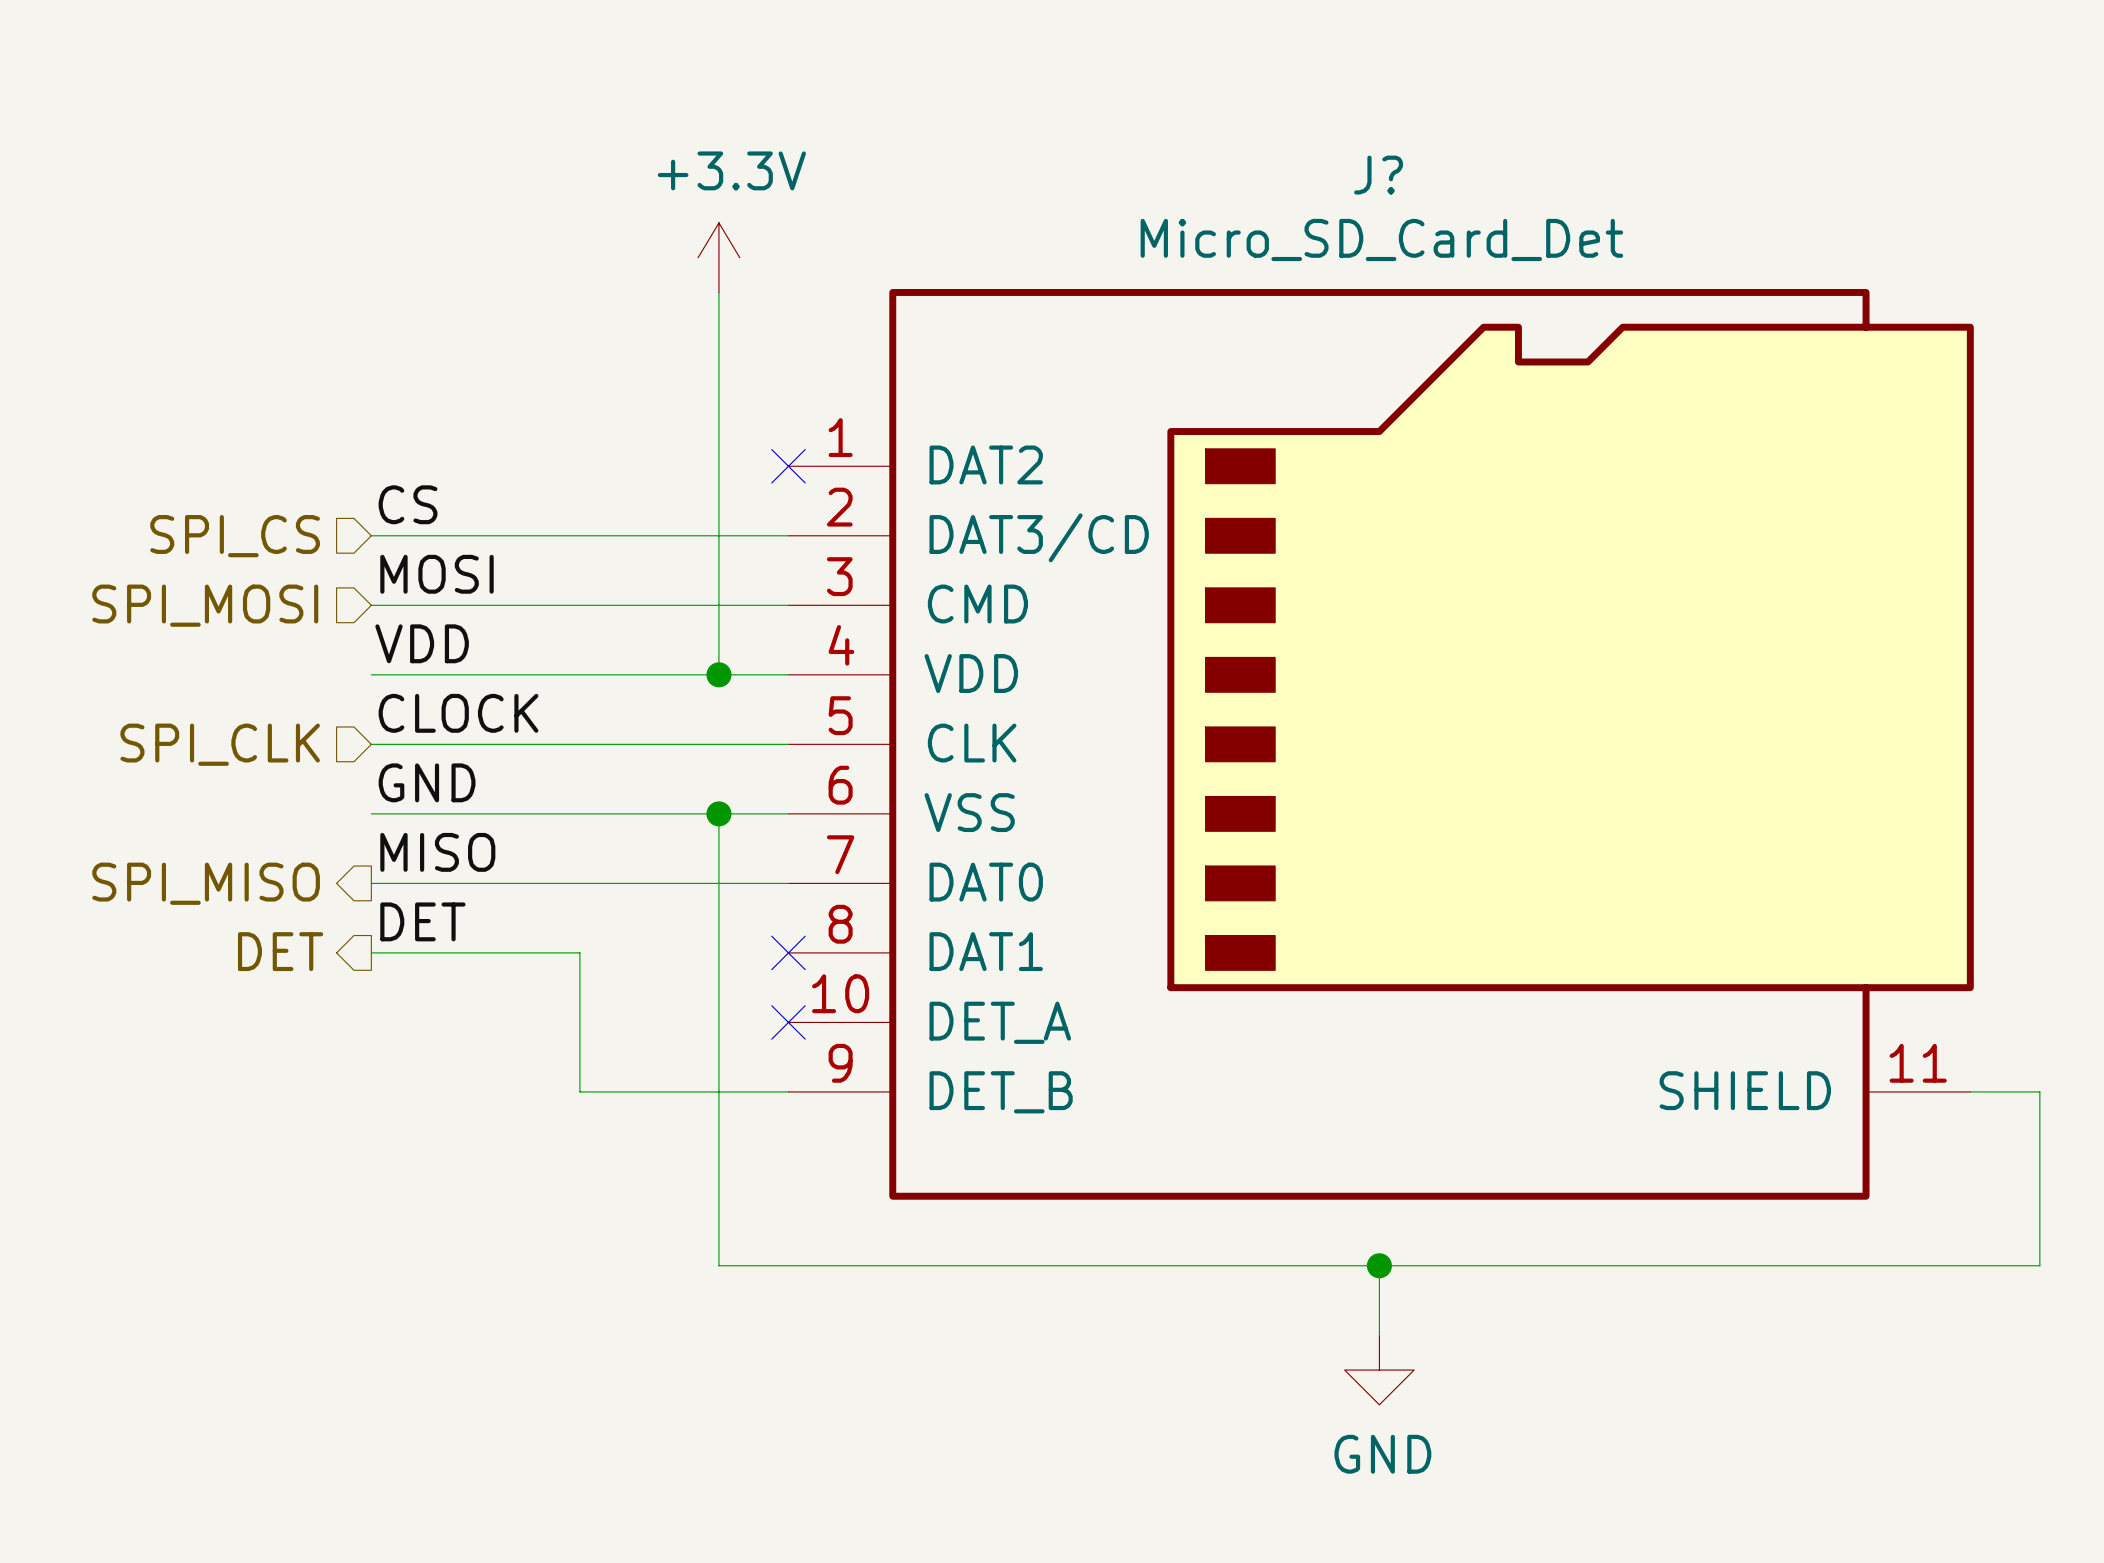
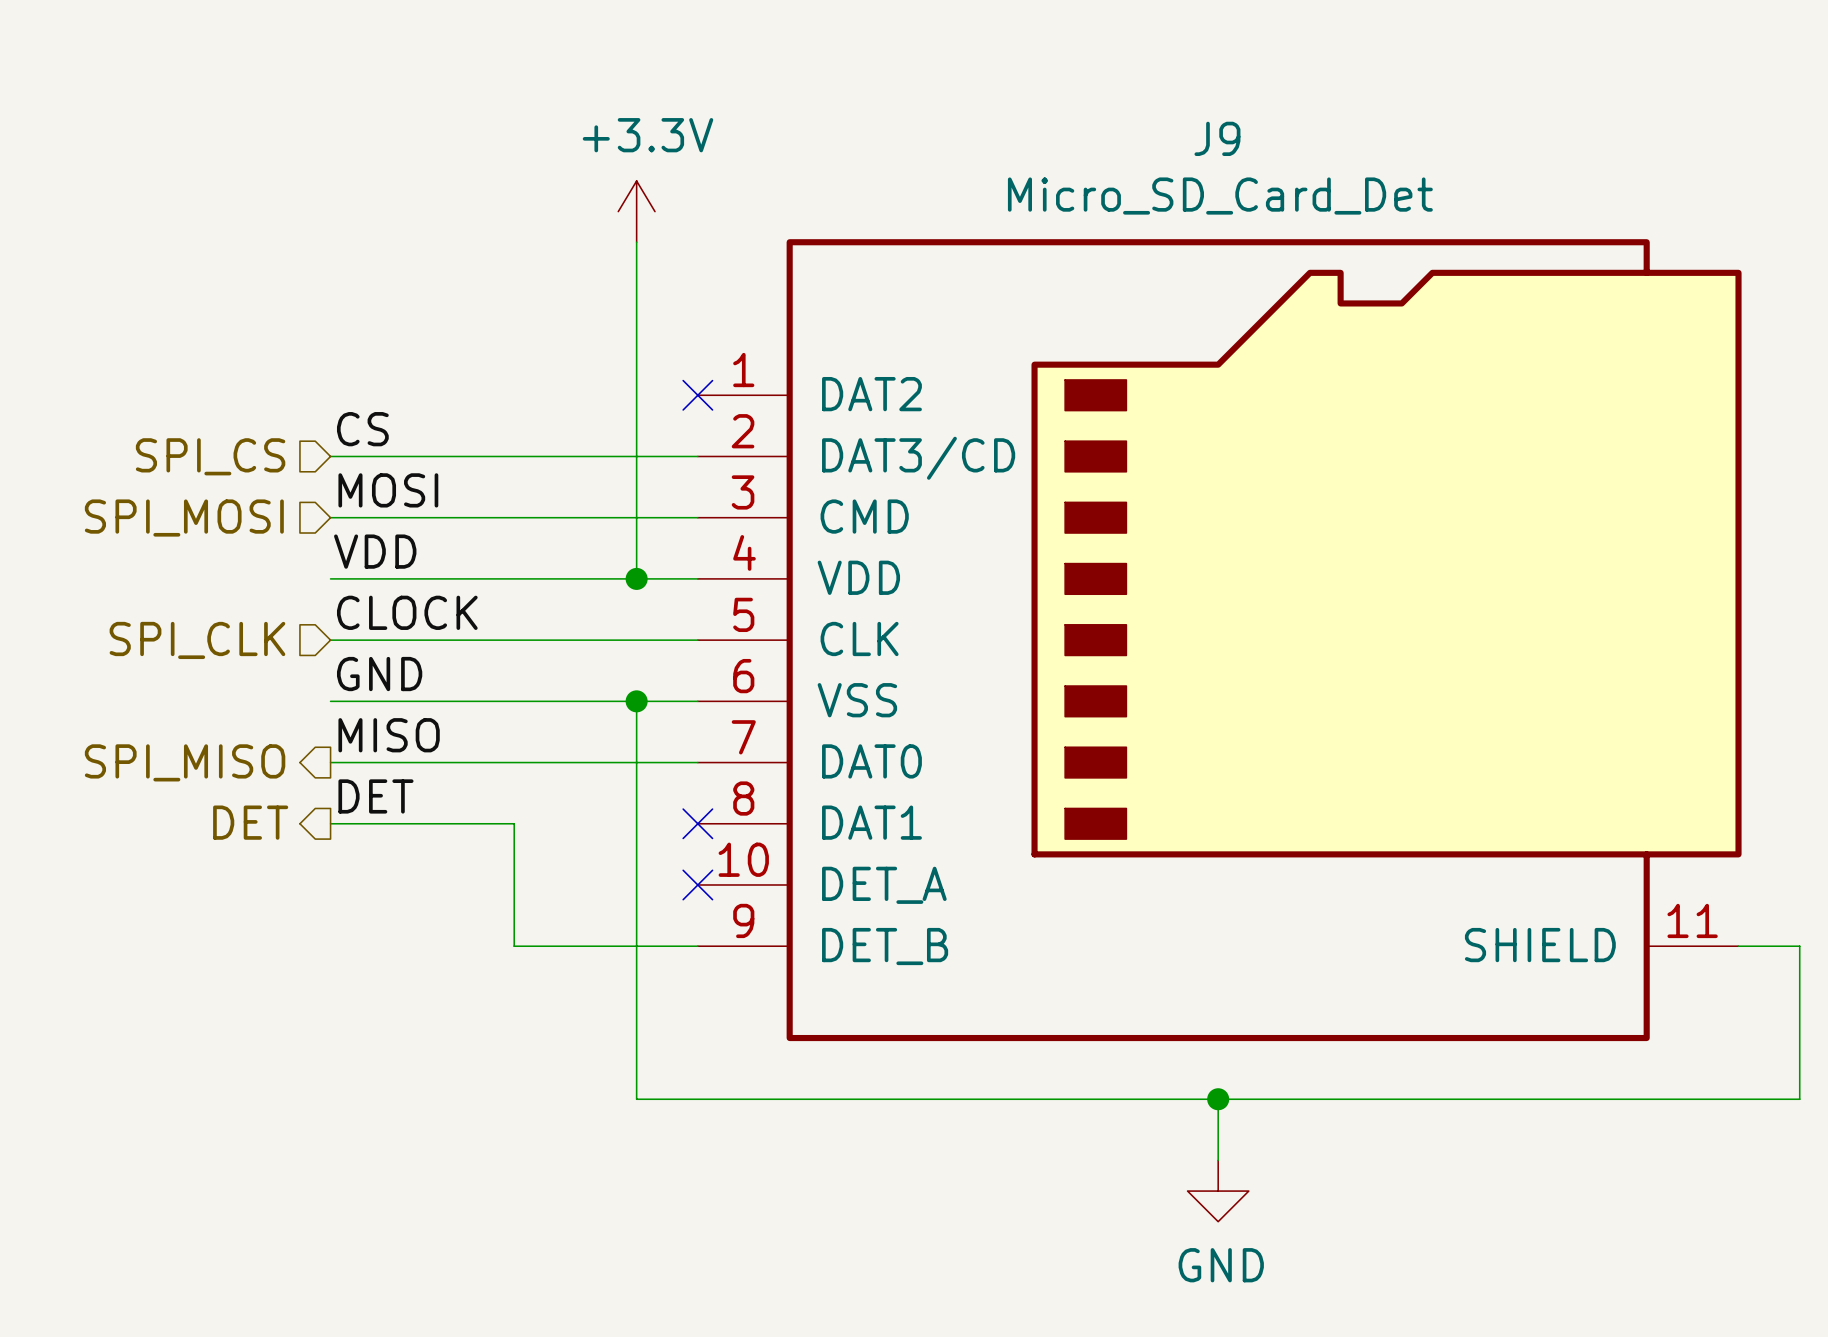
J? name: J? (1378, 175) -> J9 (1217, 138)

